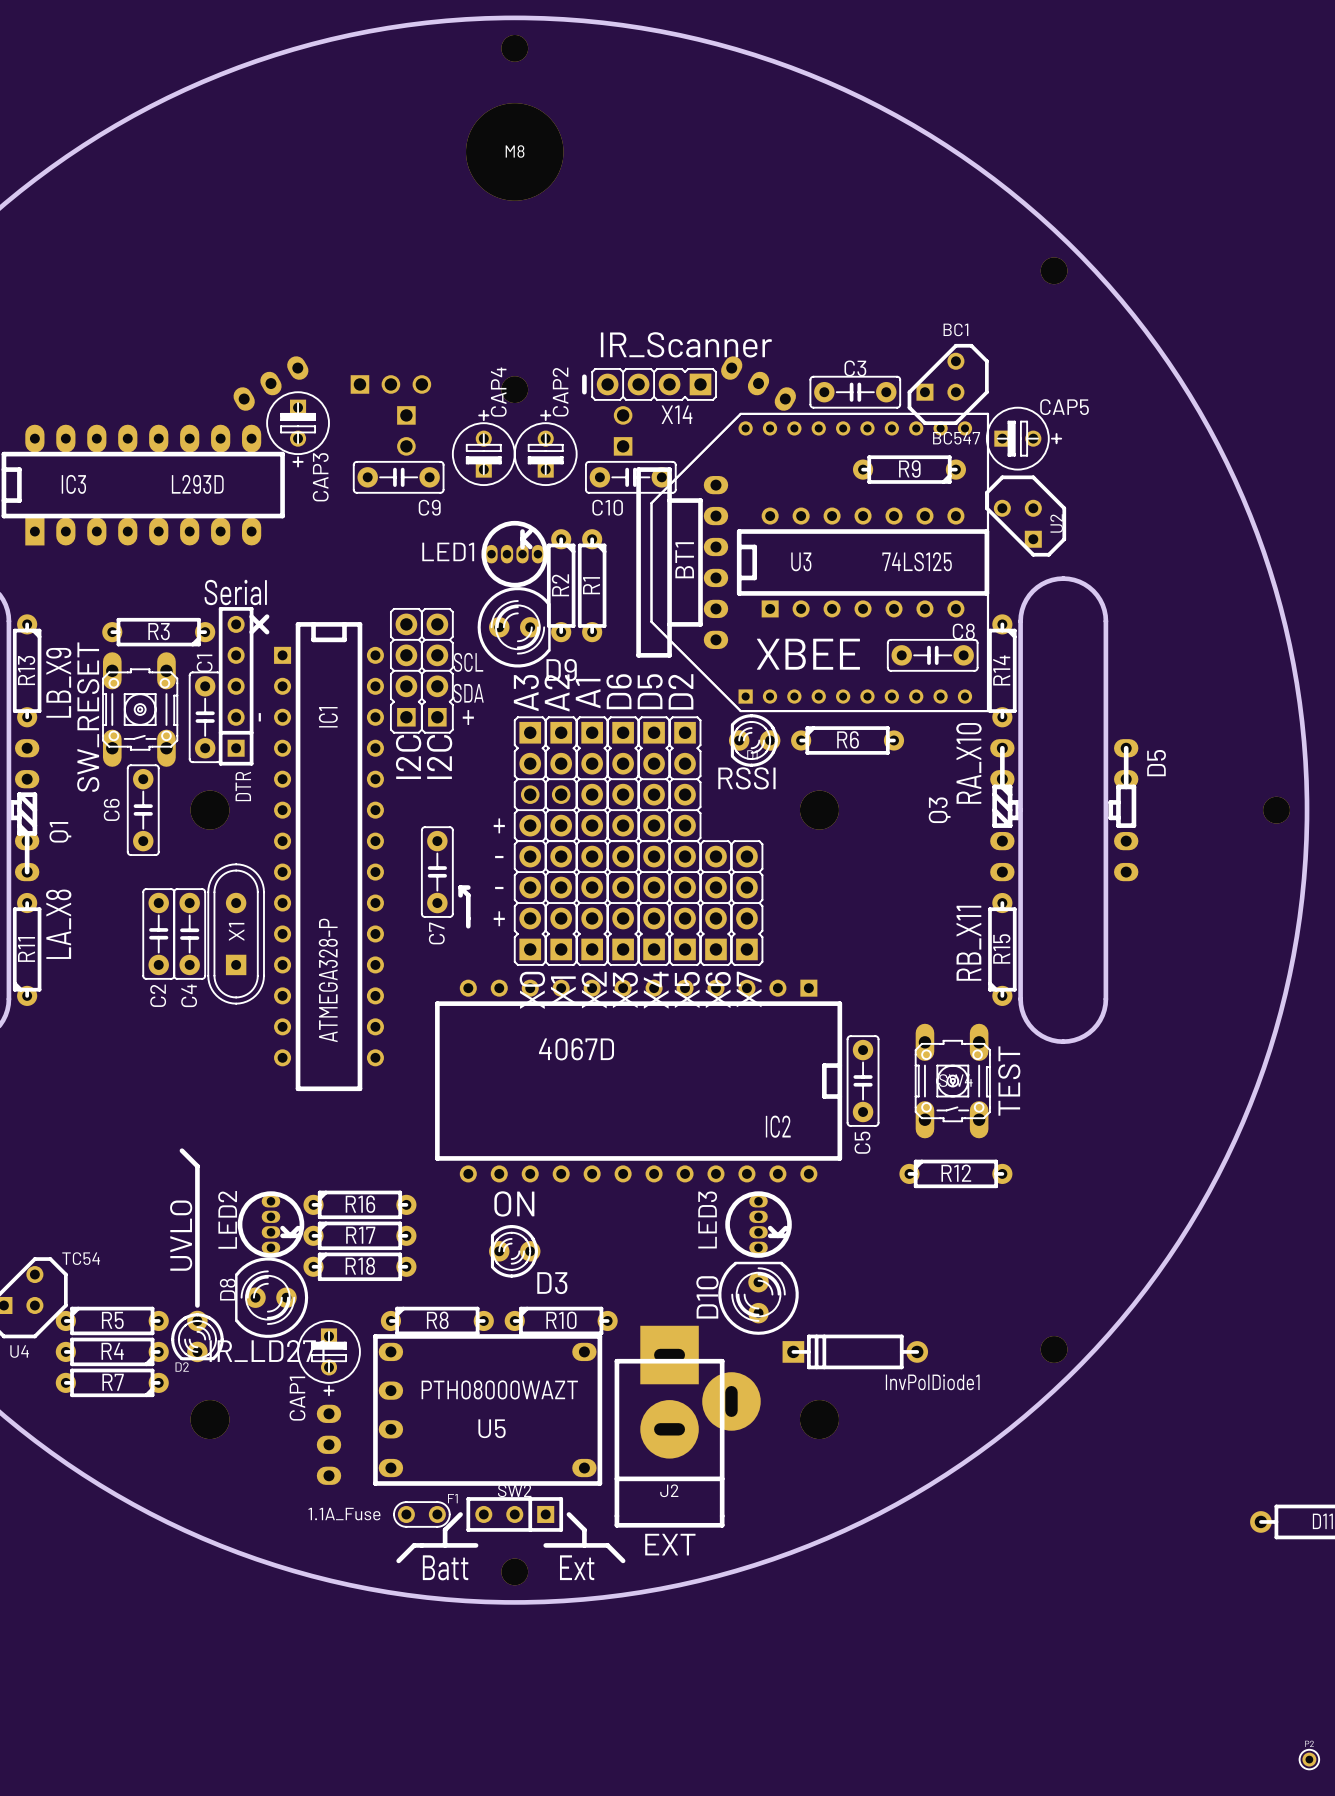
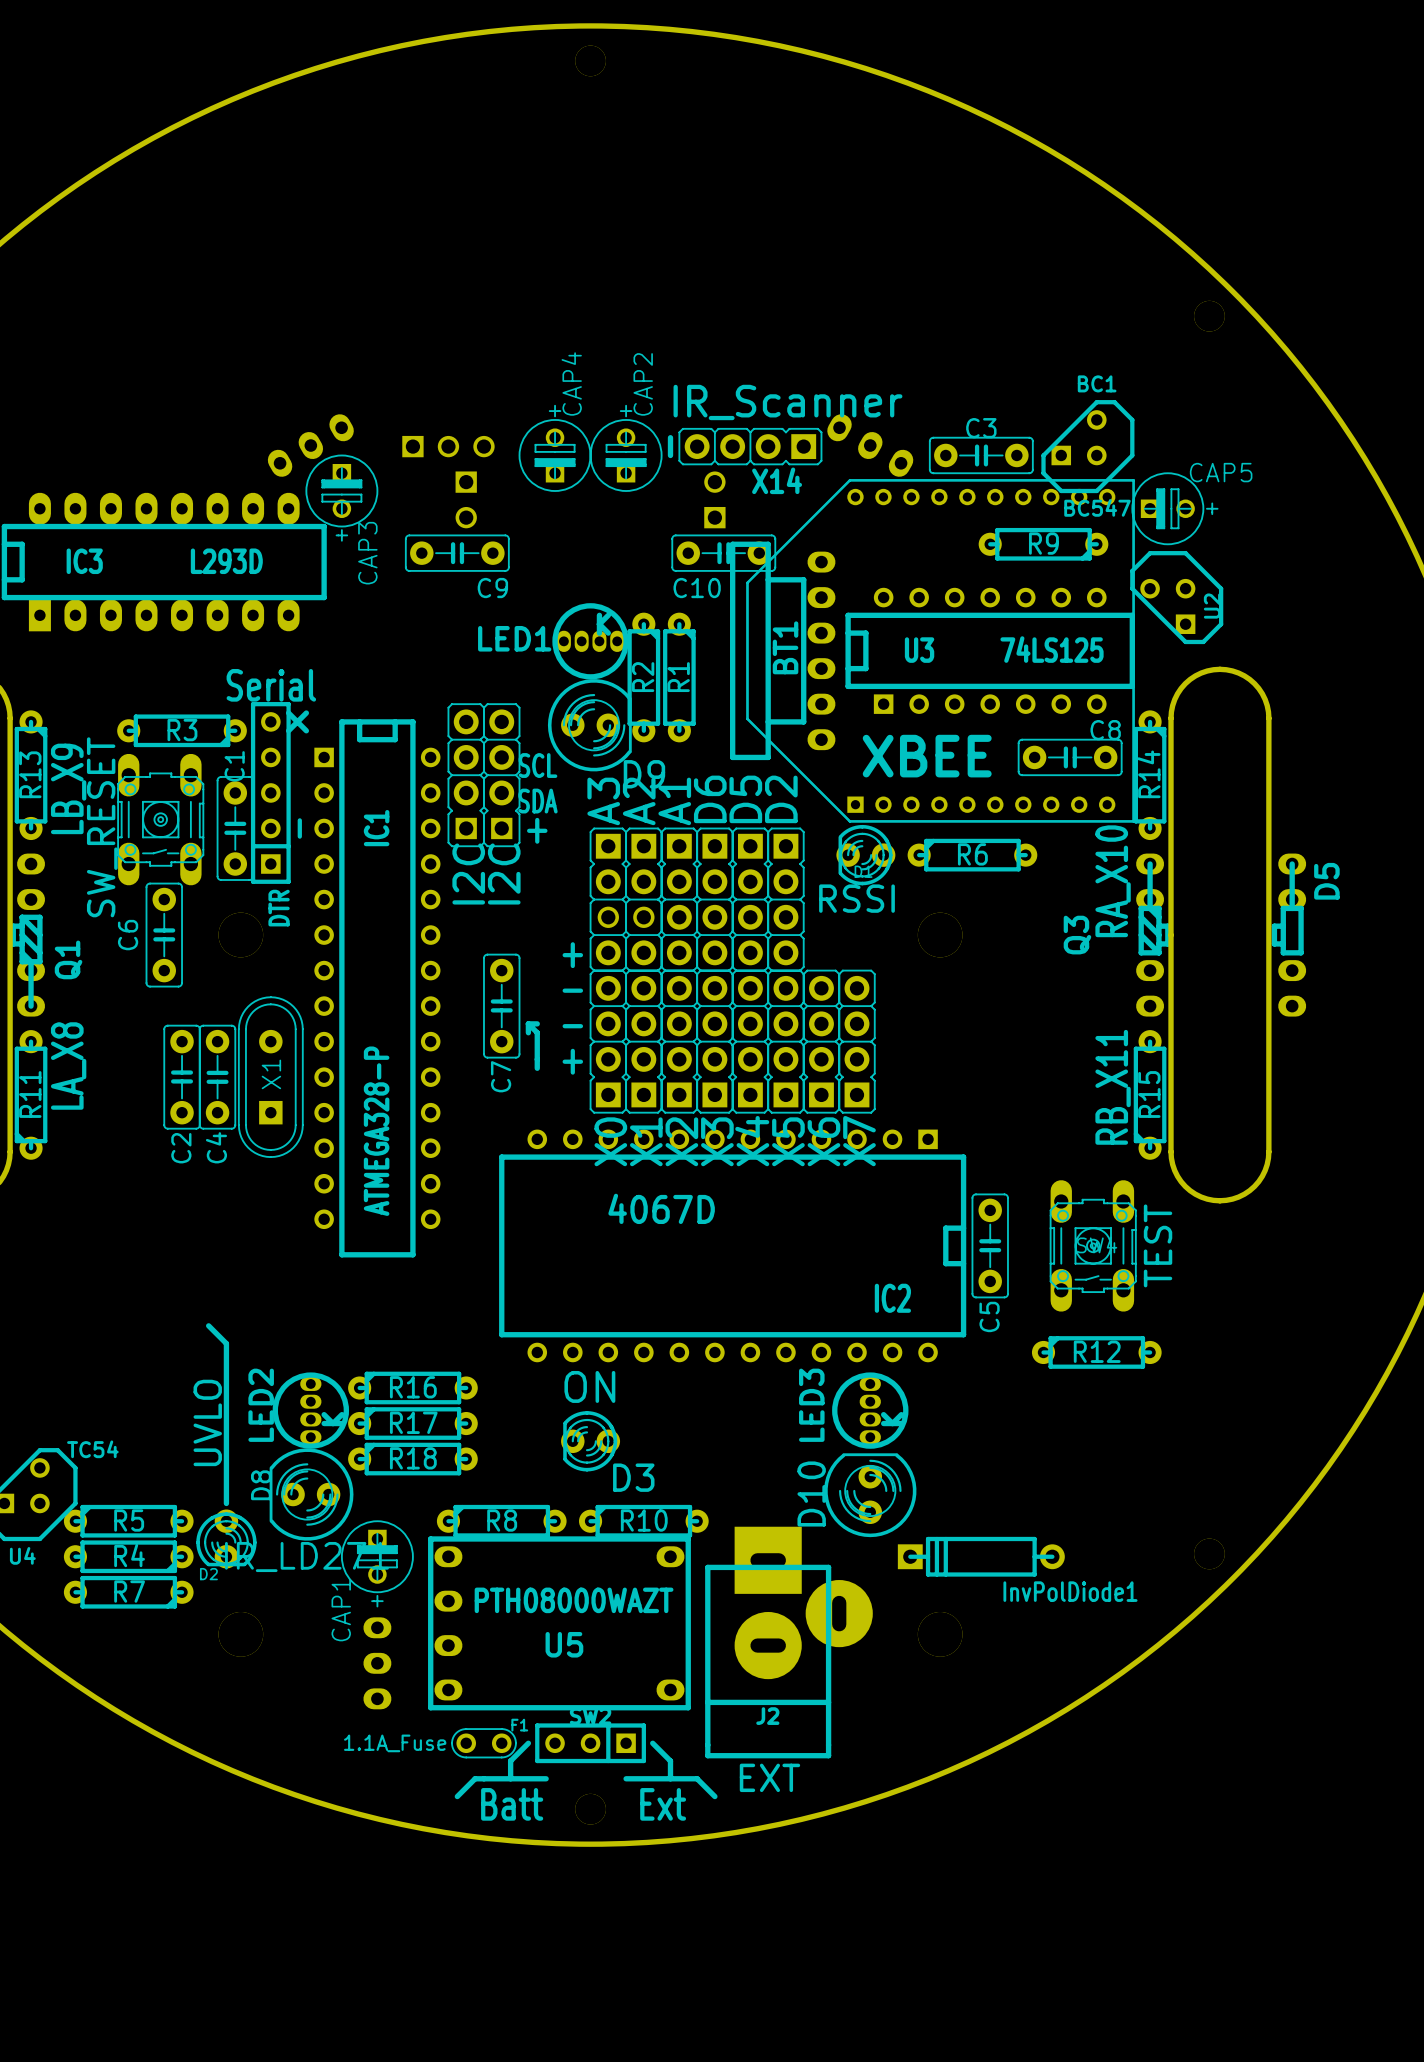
M8: (514, 151) -> none
part: (514, 389) -> none
CAP4 position: (483, 447) -> (555, 448)
CAP2 position: (545, 447) -> (626, 448)

